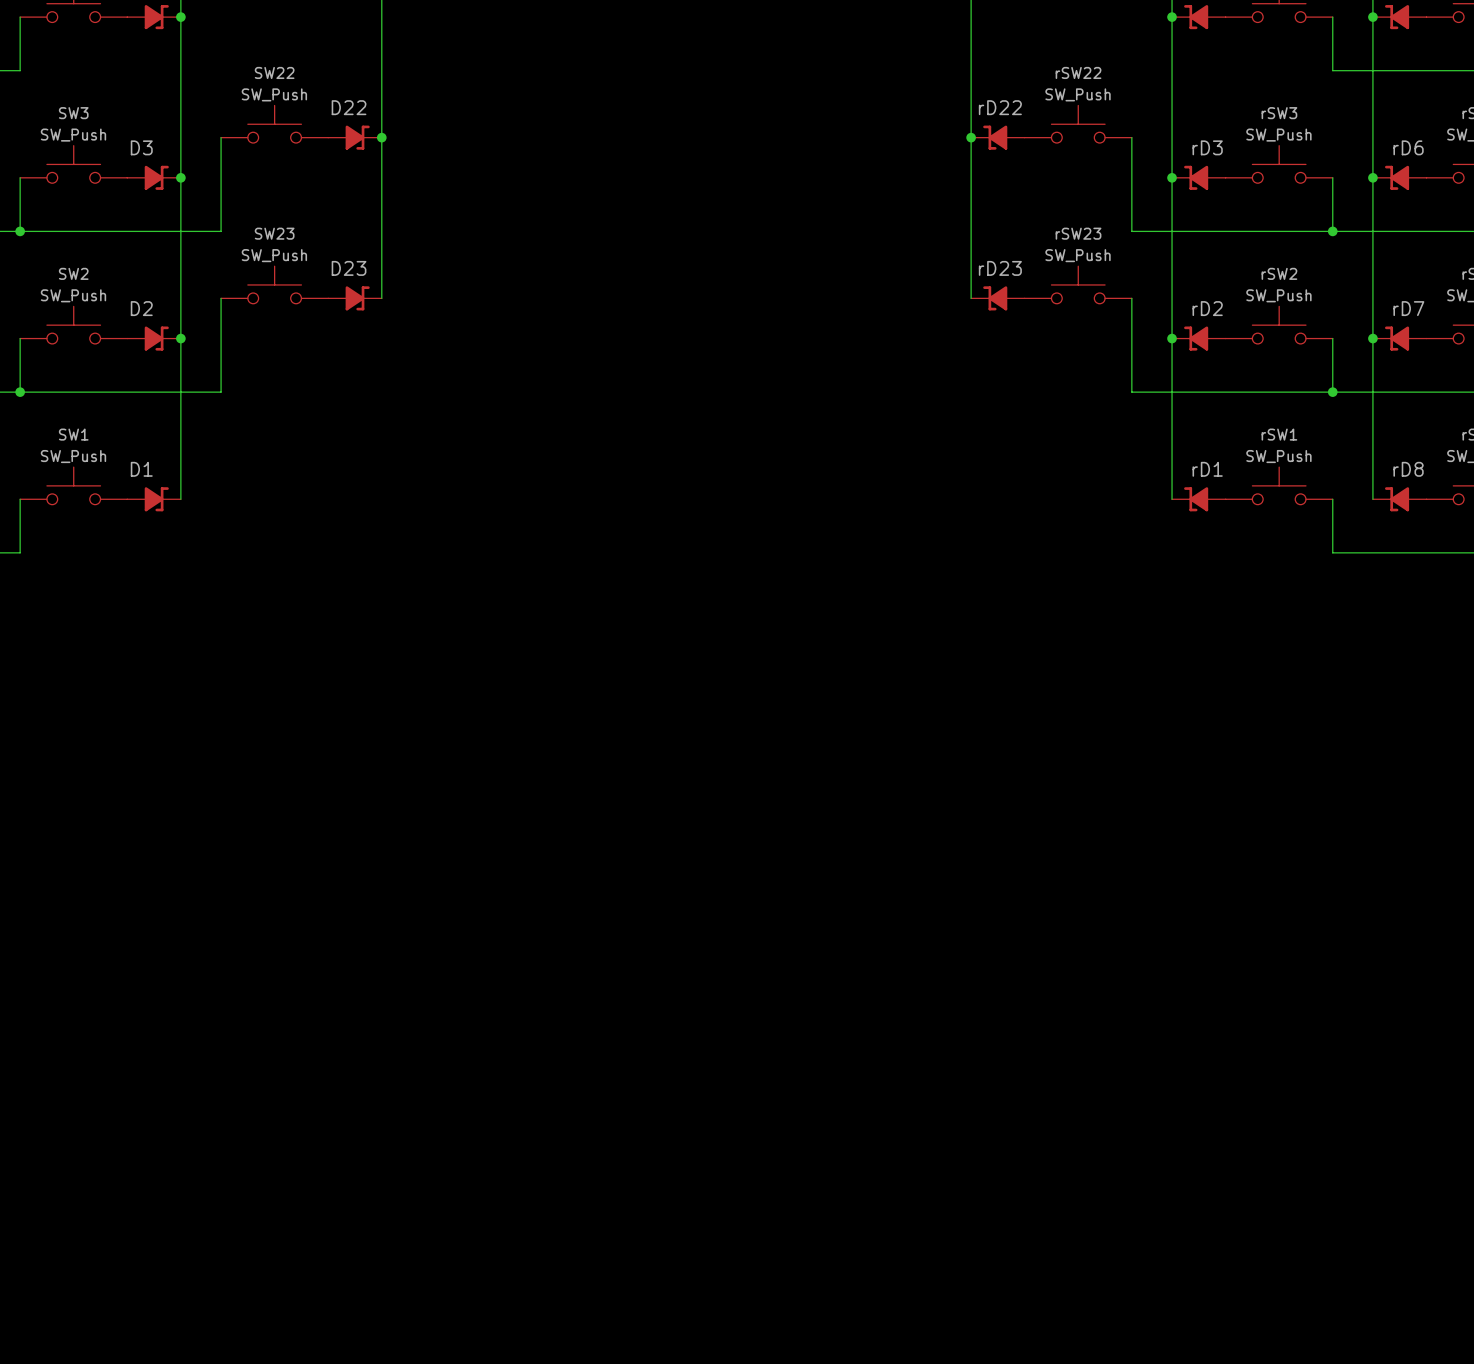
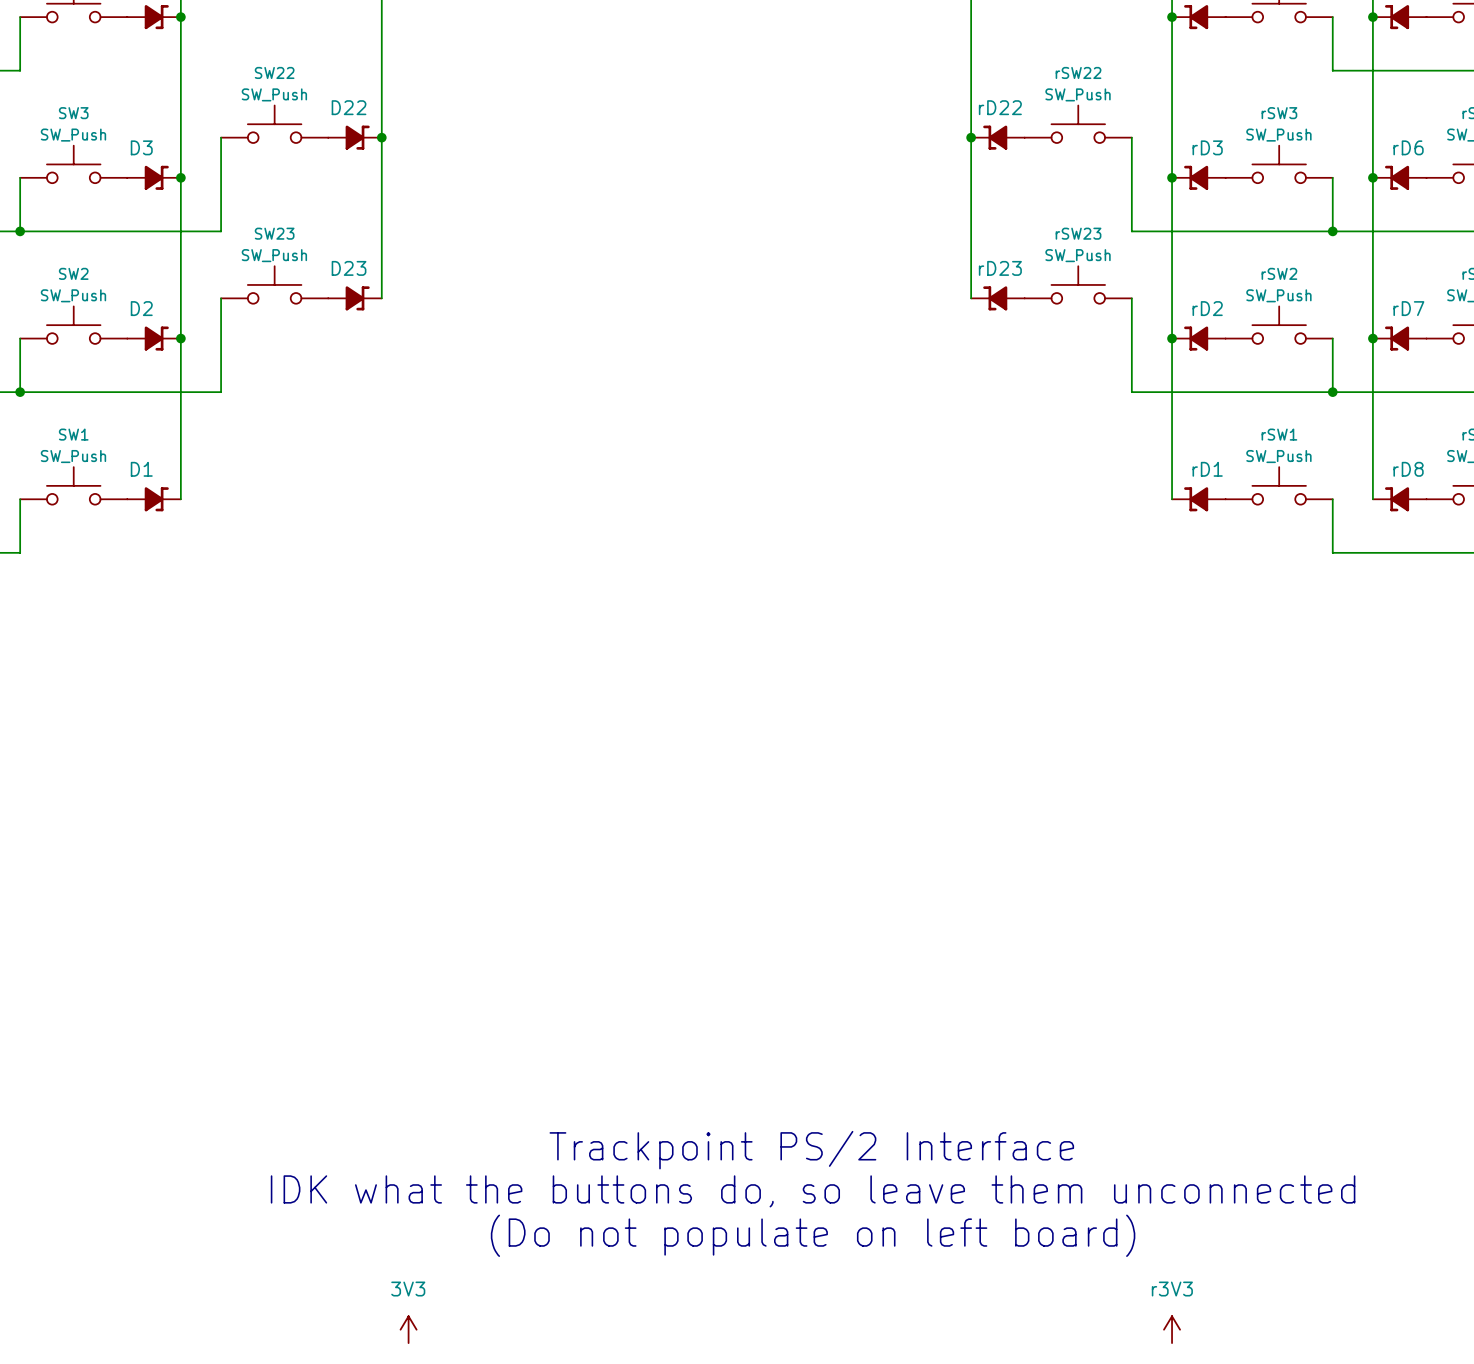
text: none -> Trackpoint PS/2 Interface (811, 1150)
text: none -> IDK what the buttons do, so leave them unconnected (813, 1191)
text: none -> (Do not populate on left board) (813, 1235)
power symbol: none -> 3V3 (408, 1329)
power symbol: none -> r3V3 (1172, 1329)

